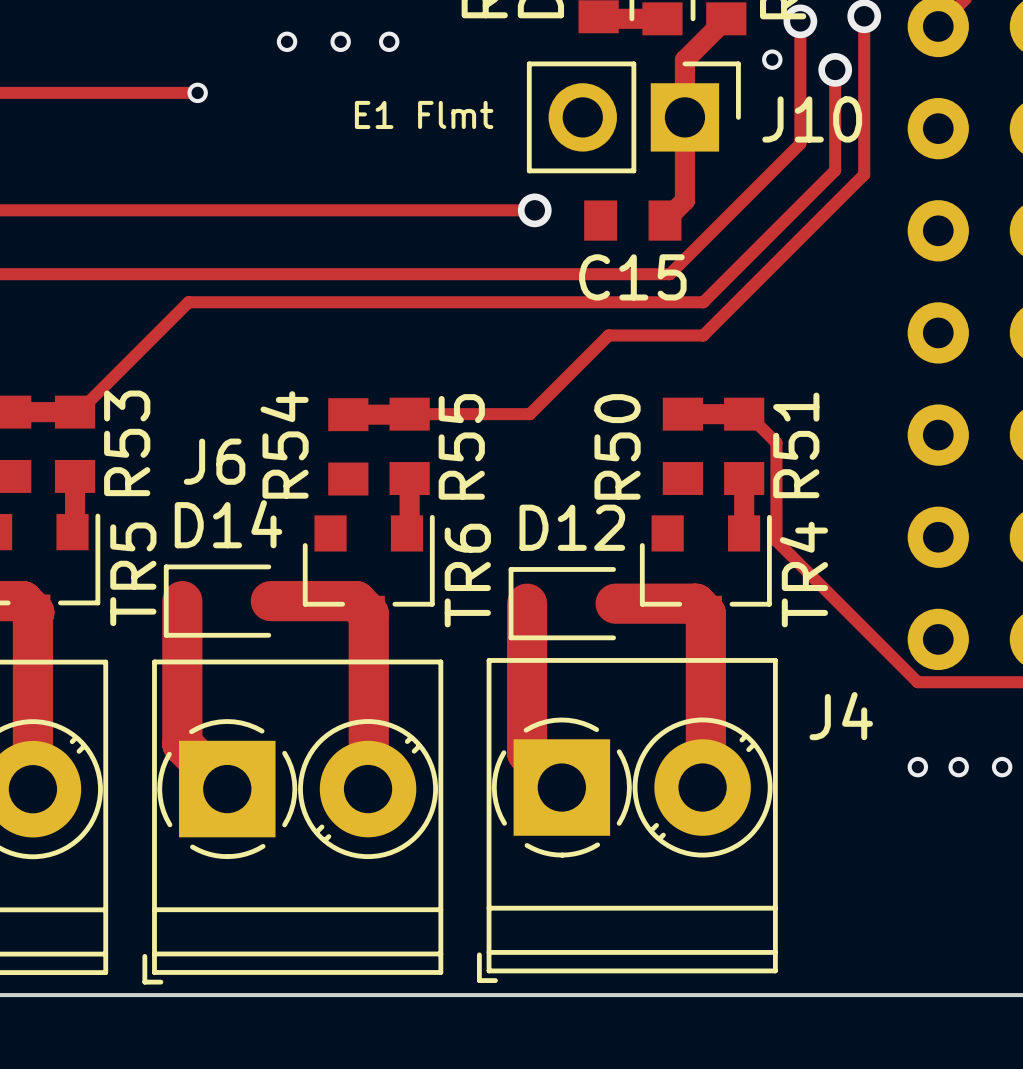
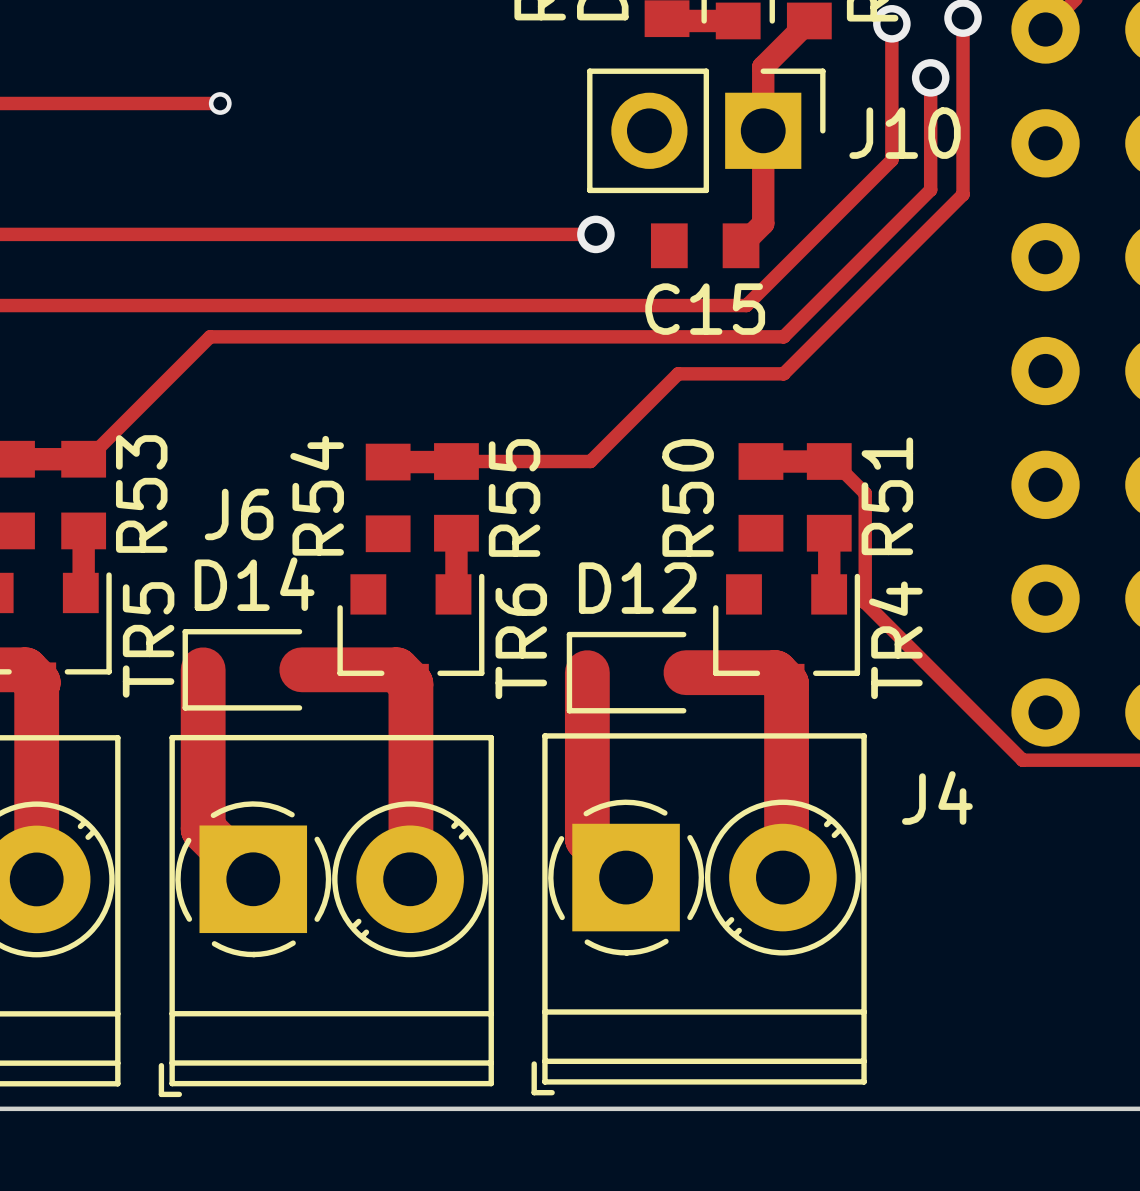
via: (287, 41) -> none
via: (340, 41) -> none
via: (389, 41) -> none
via: (772, 59) -> none
text: E1 Flmt (424, 114) -> none
via: (917, 767) -> none
via: (958, 767) -> none
via: (1002, 767) -> none

